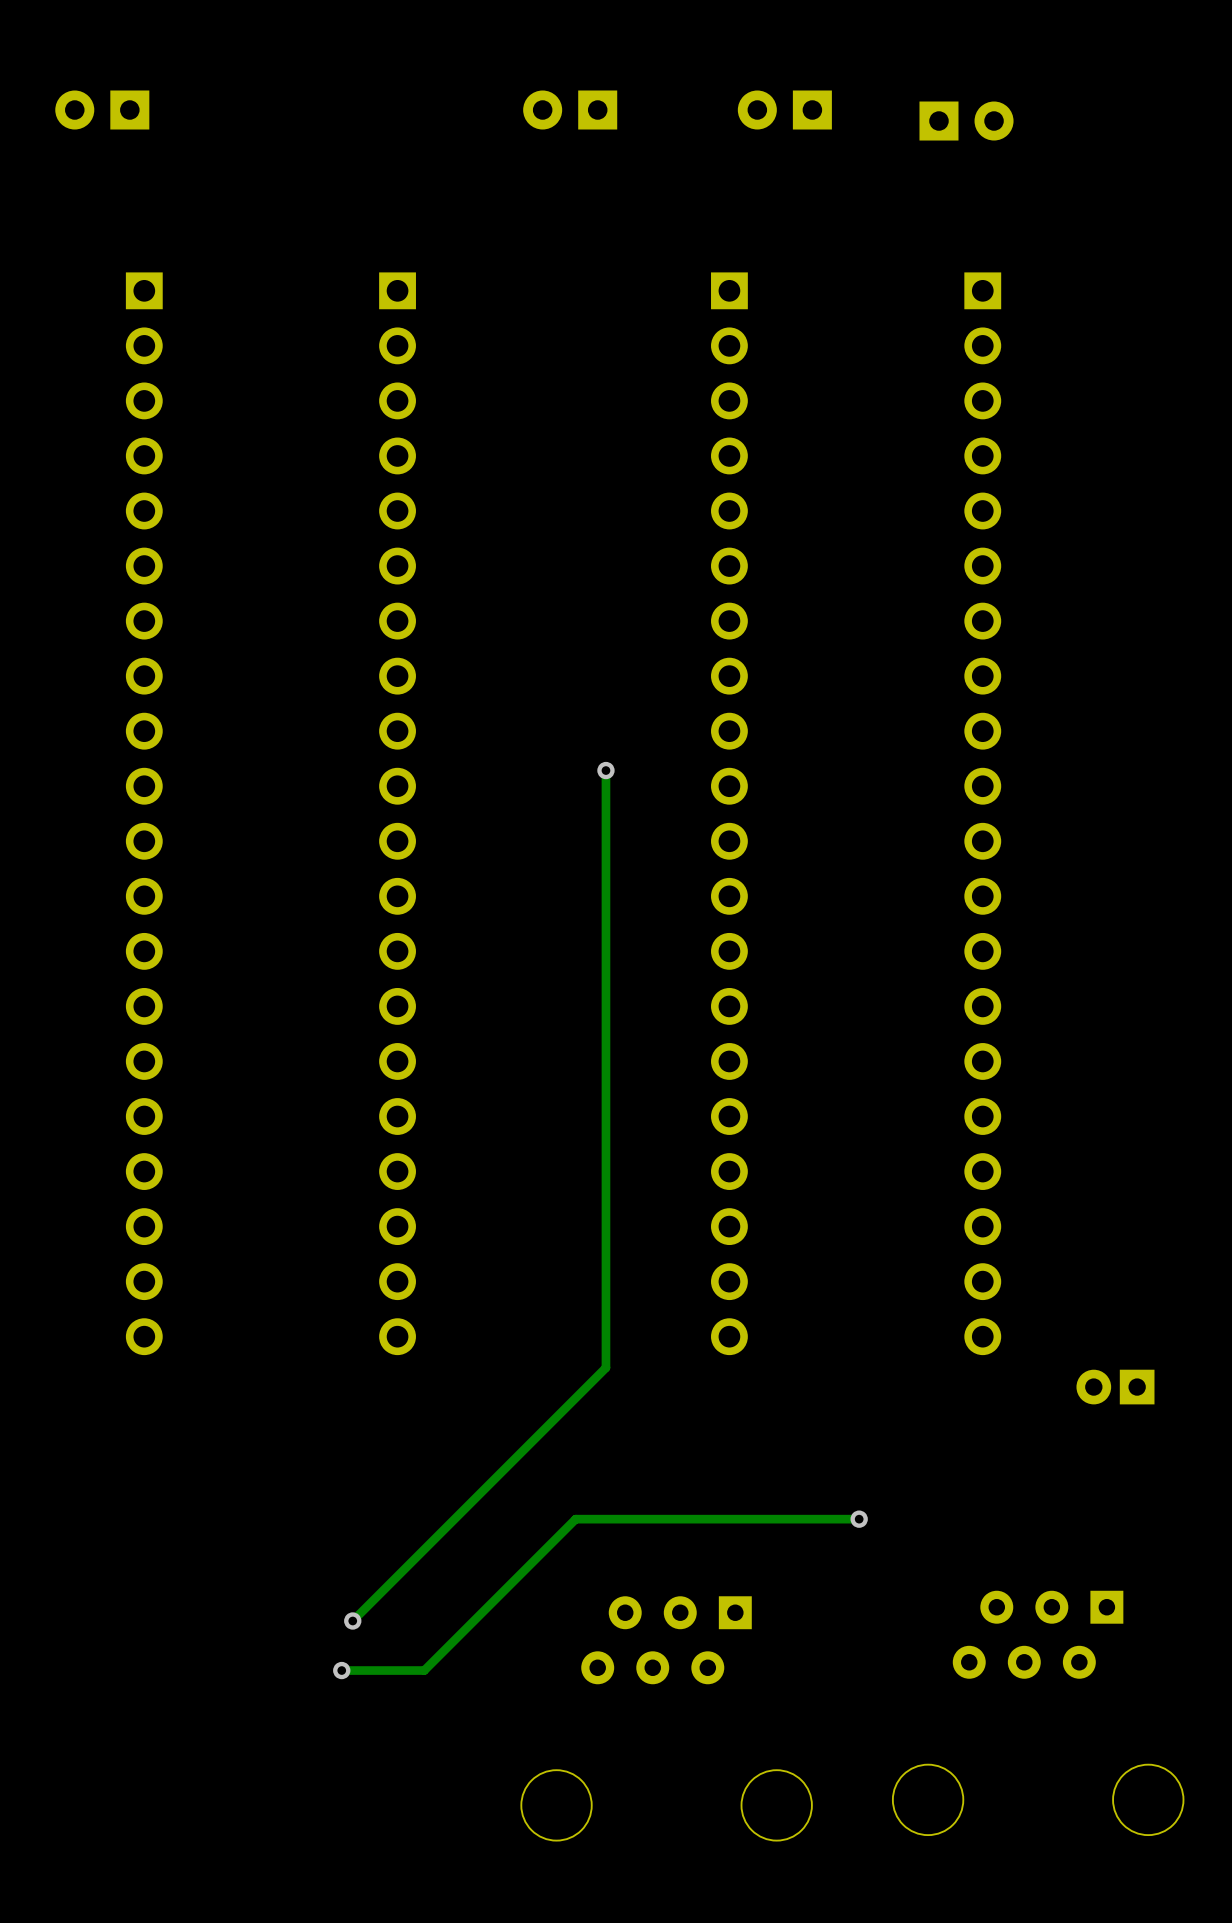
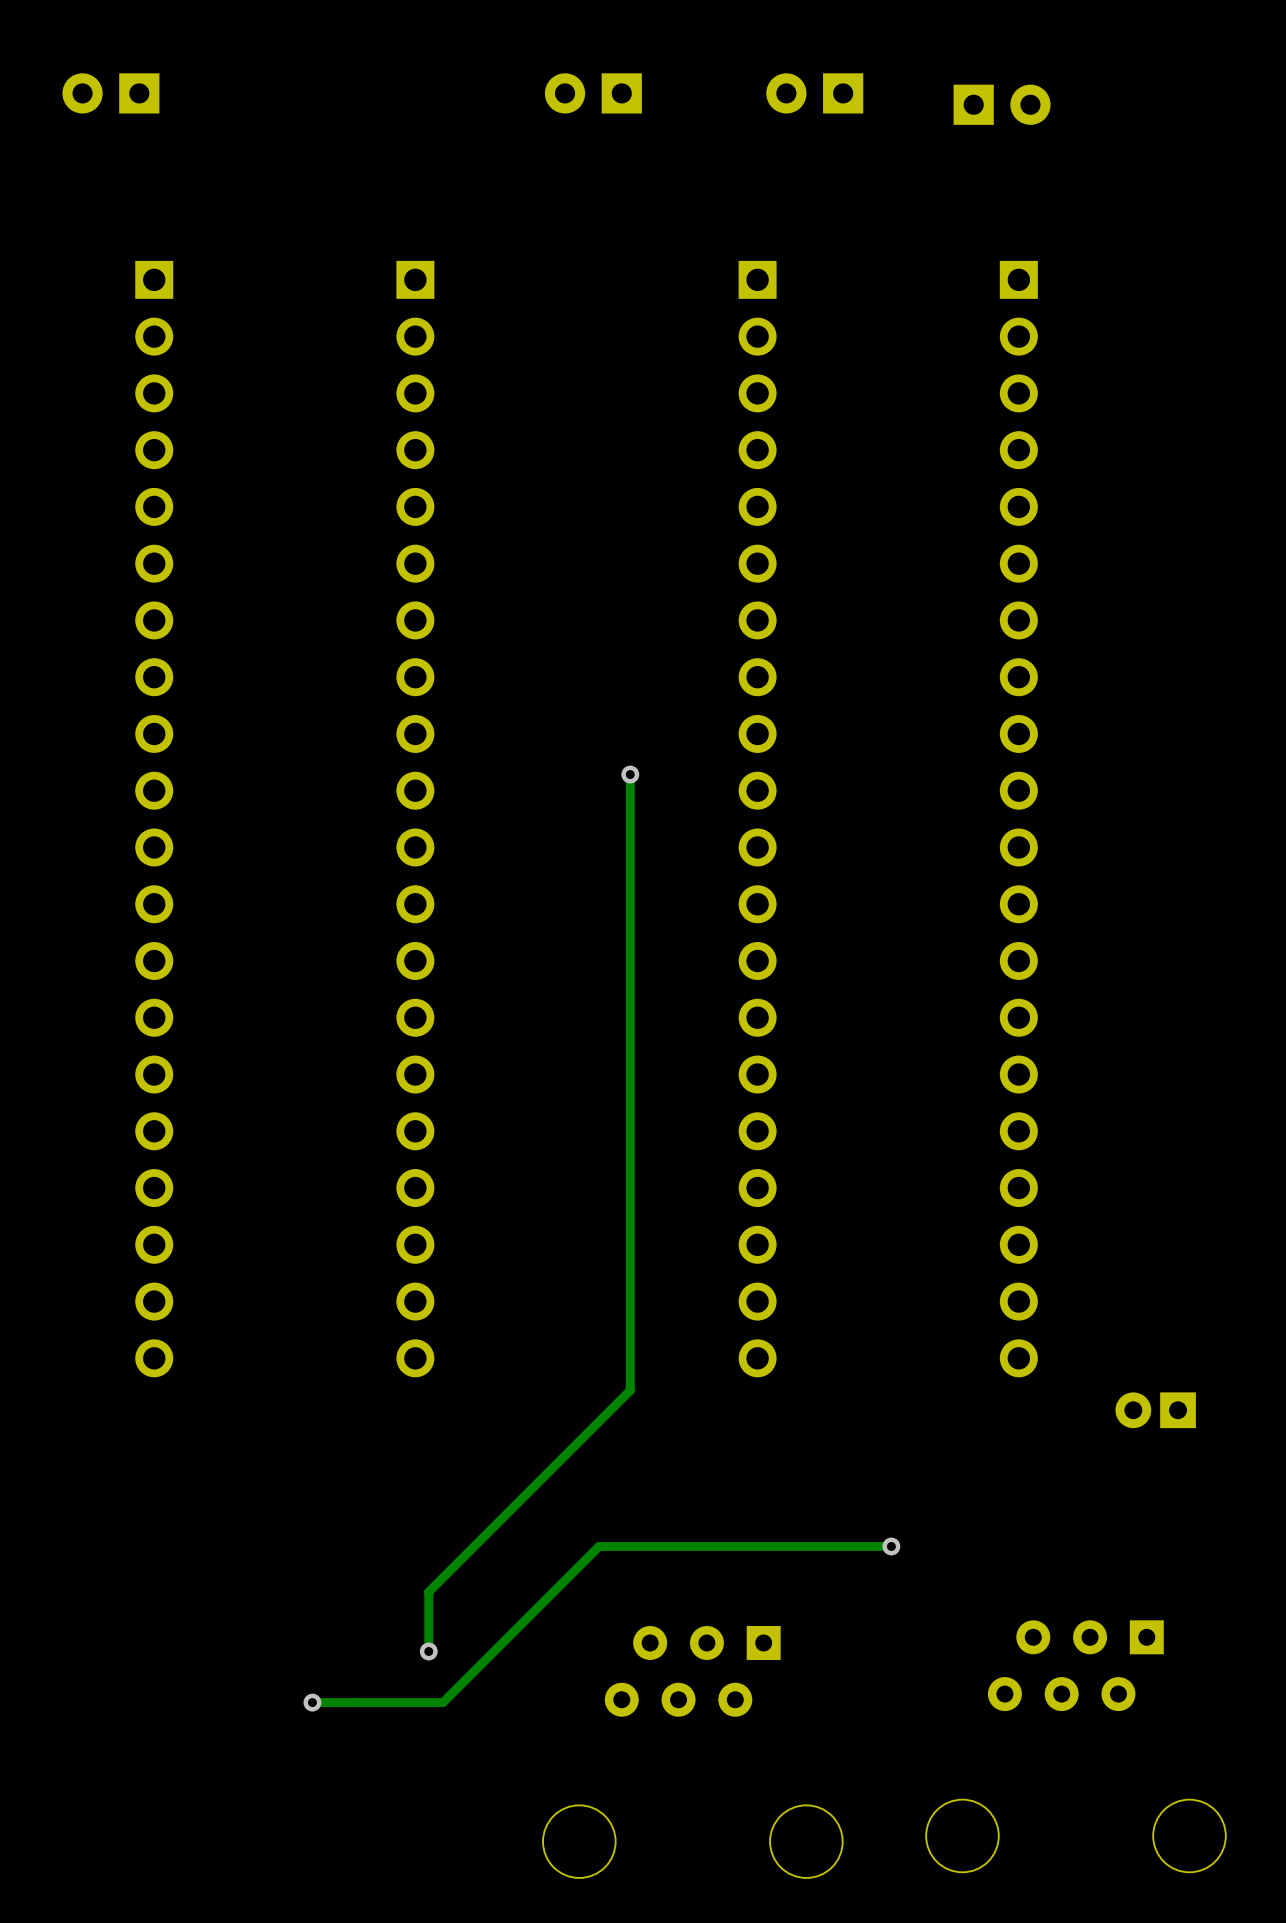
track: (410, 1563) (352, 1620) -> (428, 1591) (428, 1651)
via: (352, 1620) -> none
via: none -> (428, 1651)
via: none -> (312, 1702)
track: none -> (357, 1702) (312, 1702)
via: (341, 1670) -> none

